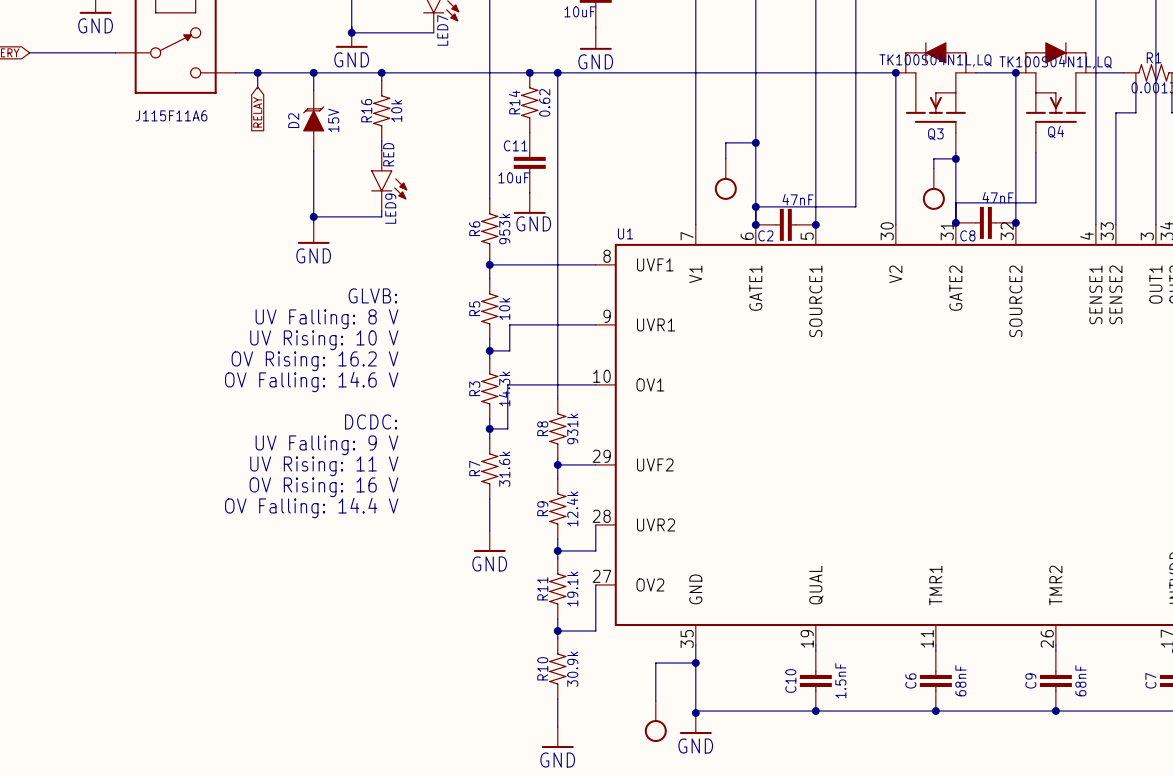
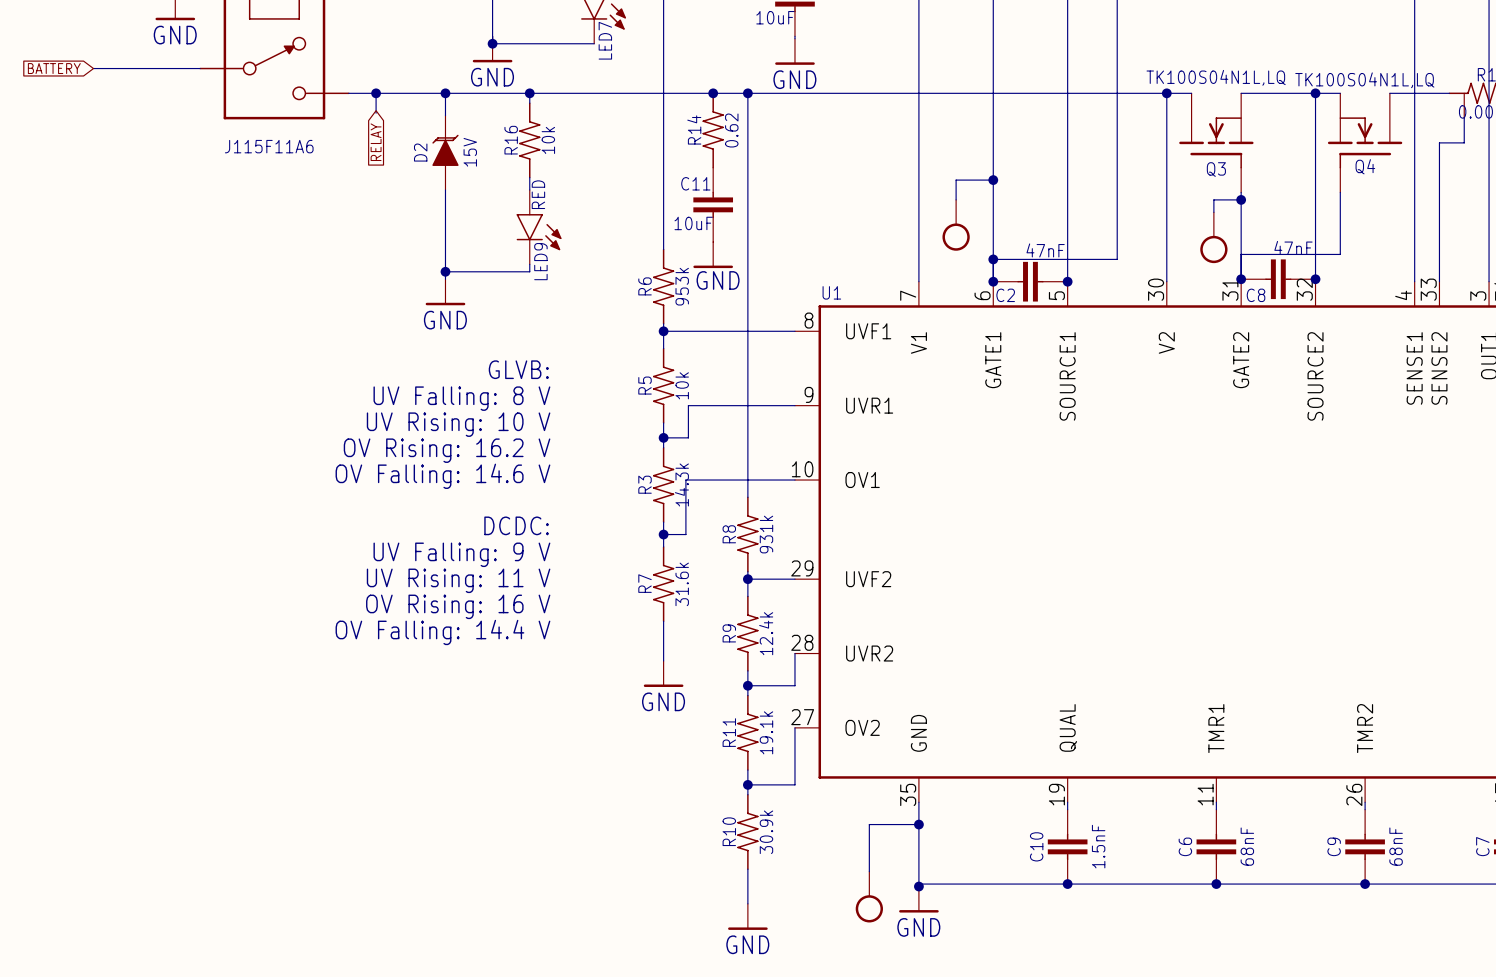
Q3 symbol: [895, 42, 976, 153] -> [1179, 93, 1254, 193]
Q4 symbol: [1015, 42, 1096, 153] -> [1327, 93, 1403, 193]

